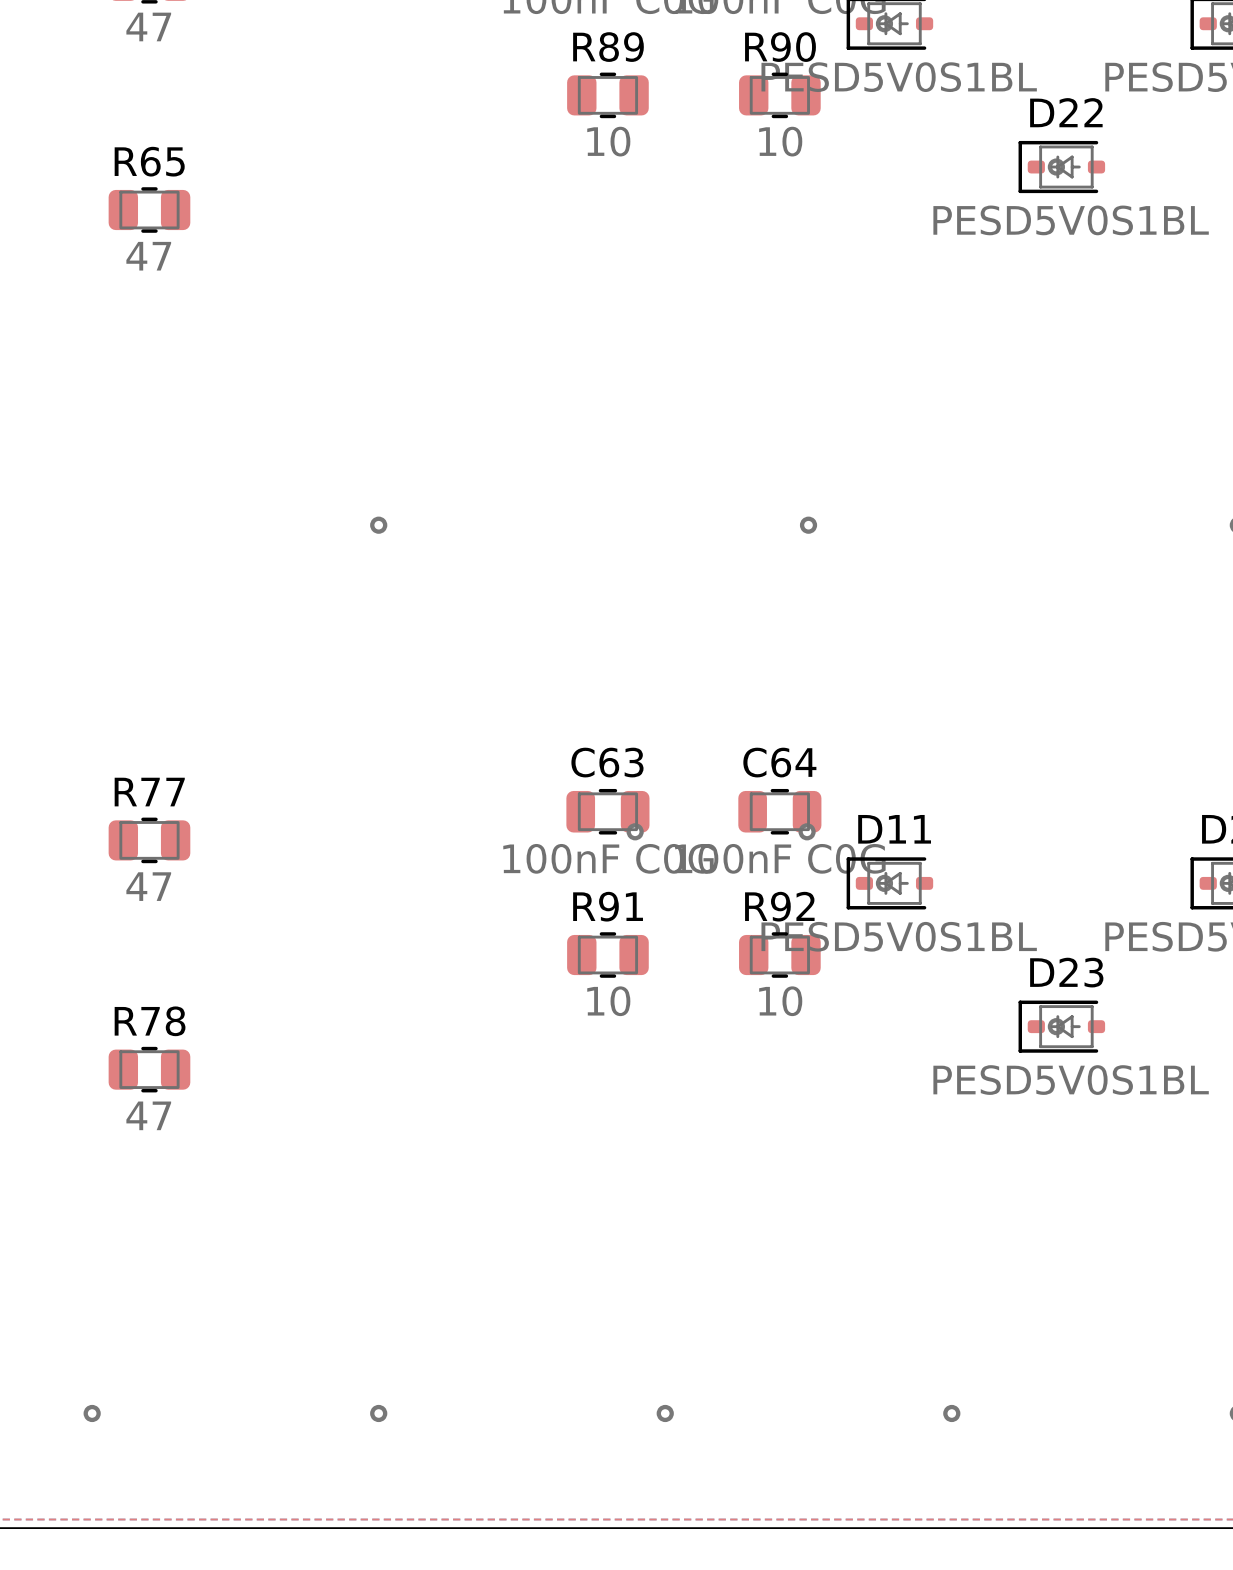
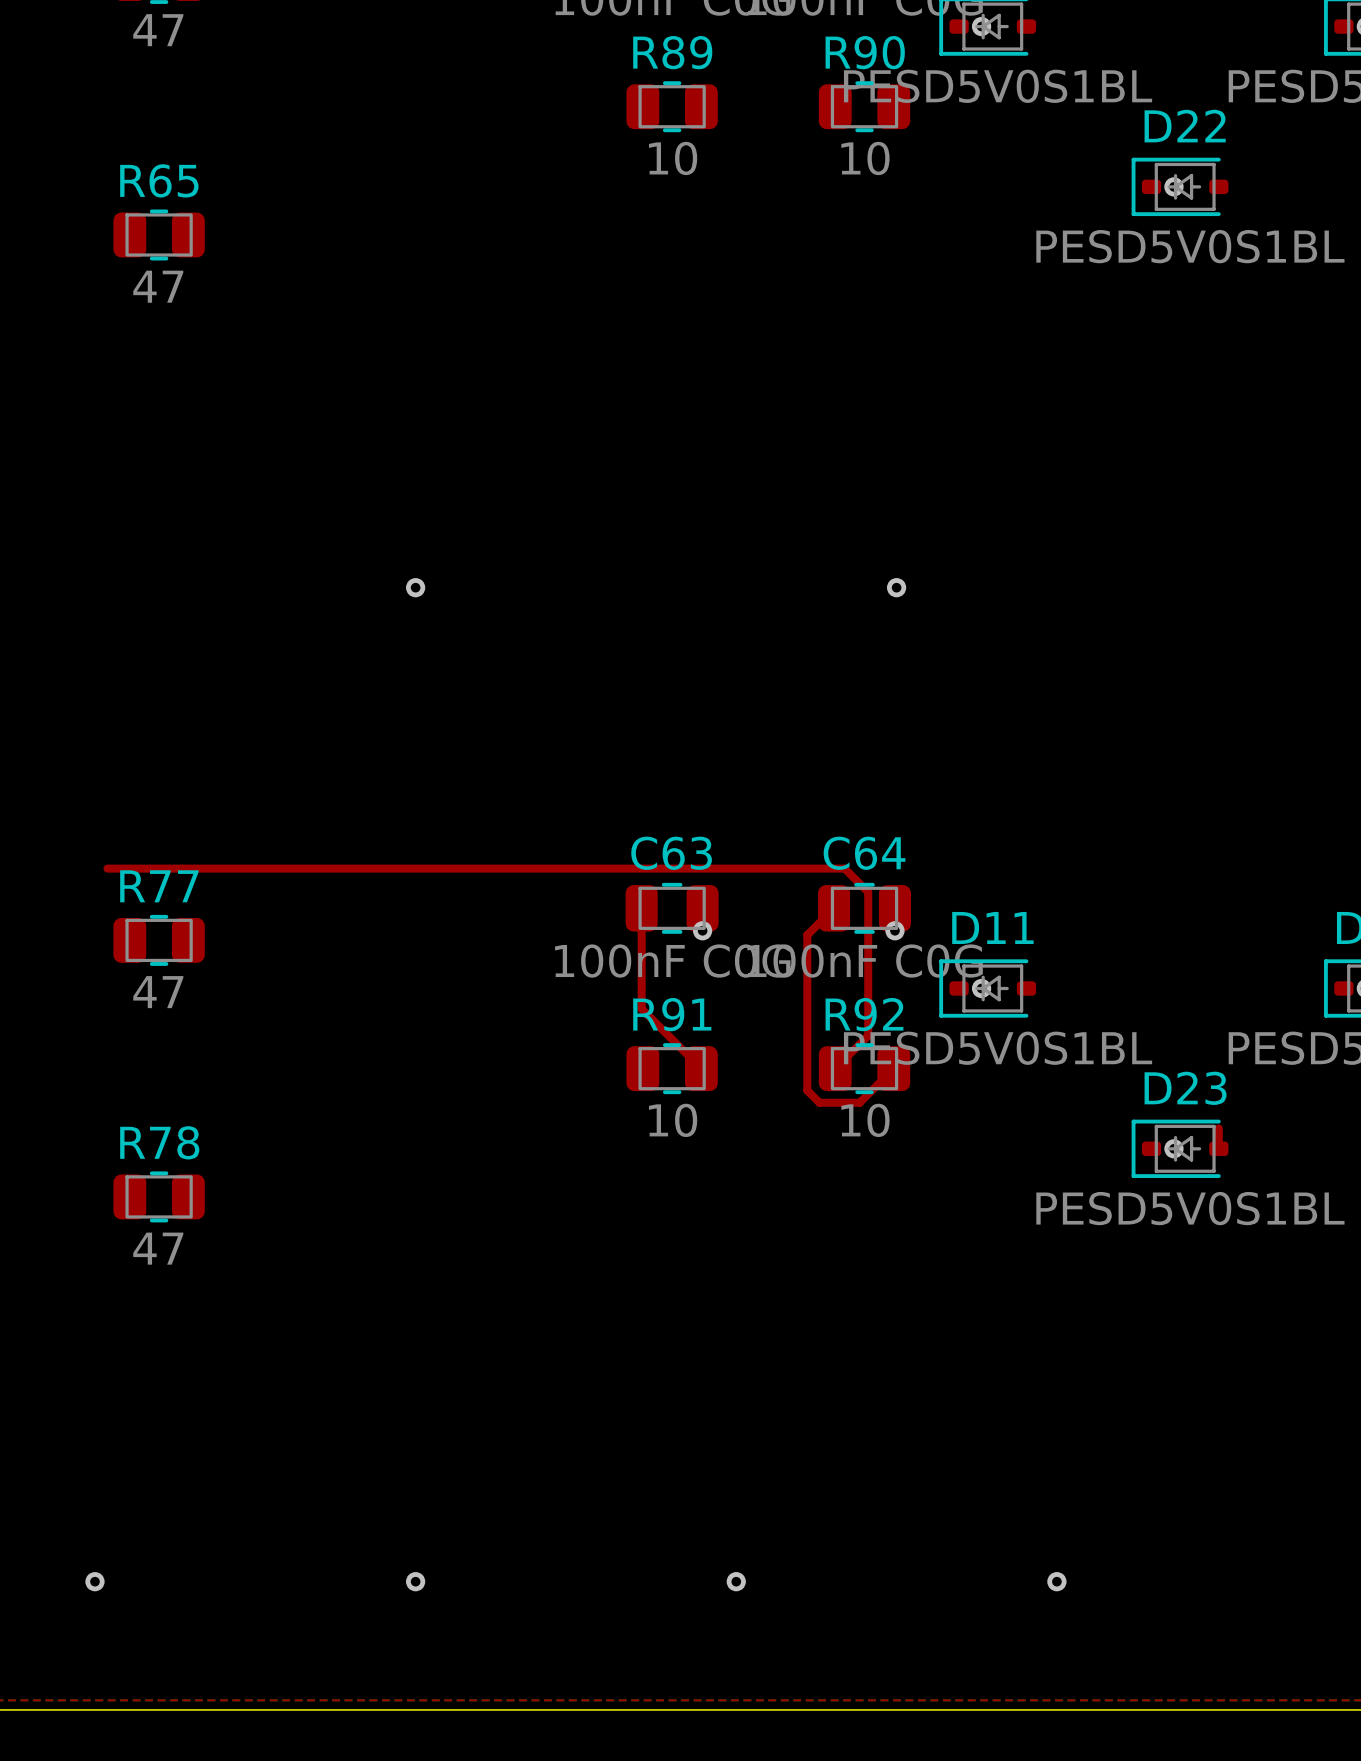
top track: none -> (107, 868) (844, 868) (868, 892) (868, 1035) (835, 1068)
top track: none -> (641, 908) (641, 1008) (701, 1068)
top track: none -> (834, 908) (807, 935) (807, 1090) (819, 1102) (859, 1102) (893, 1068)
top track: none -> (1218, 1128) (1218, 1148)

